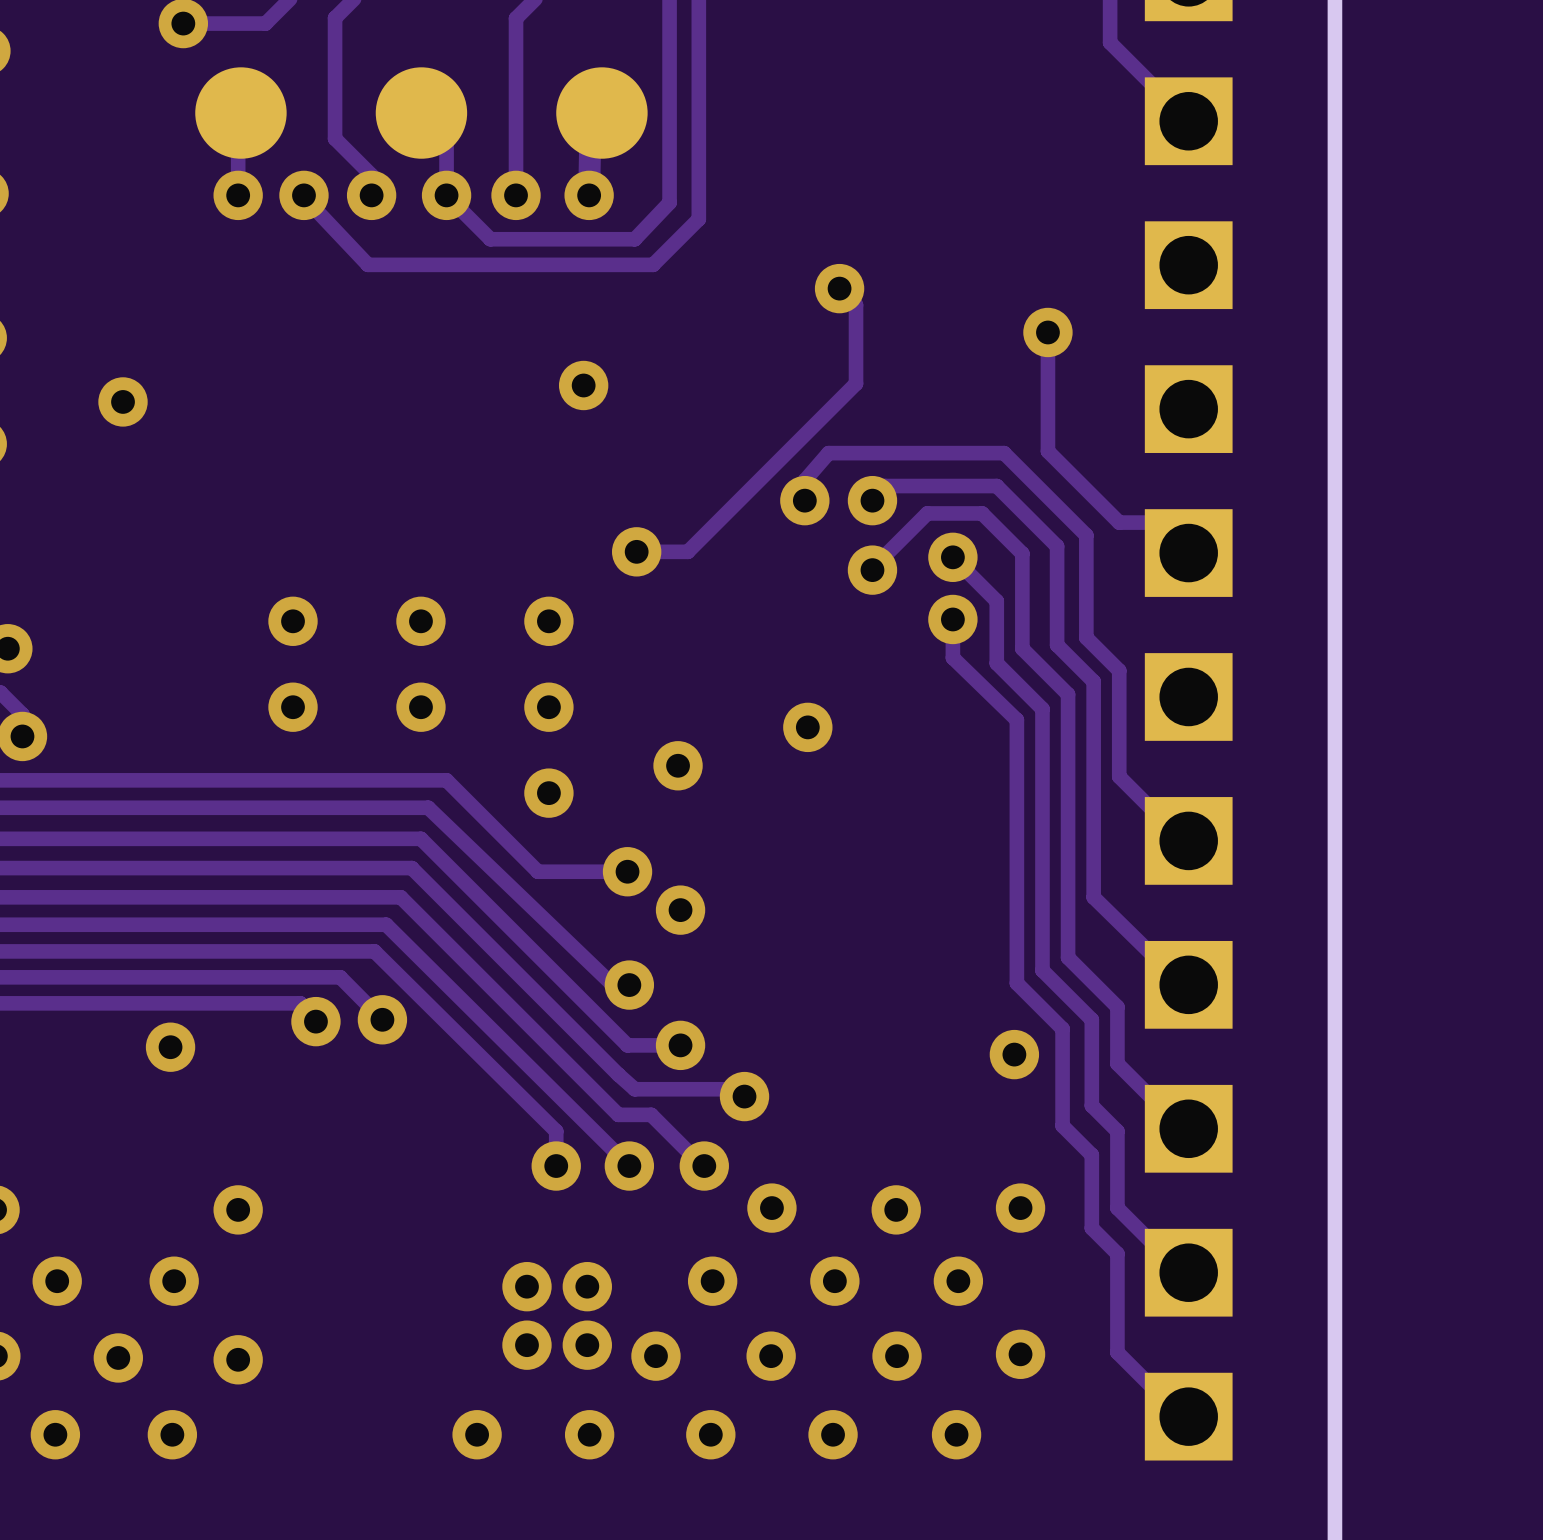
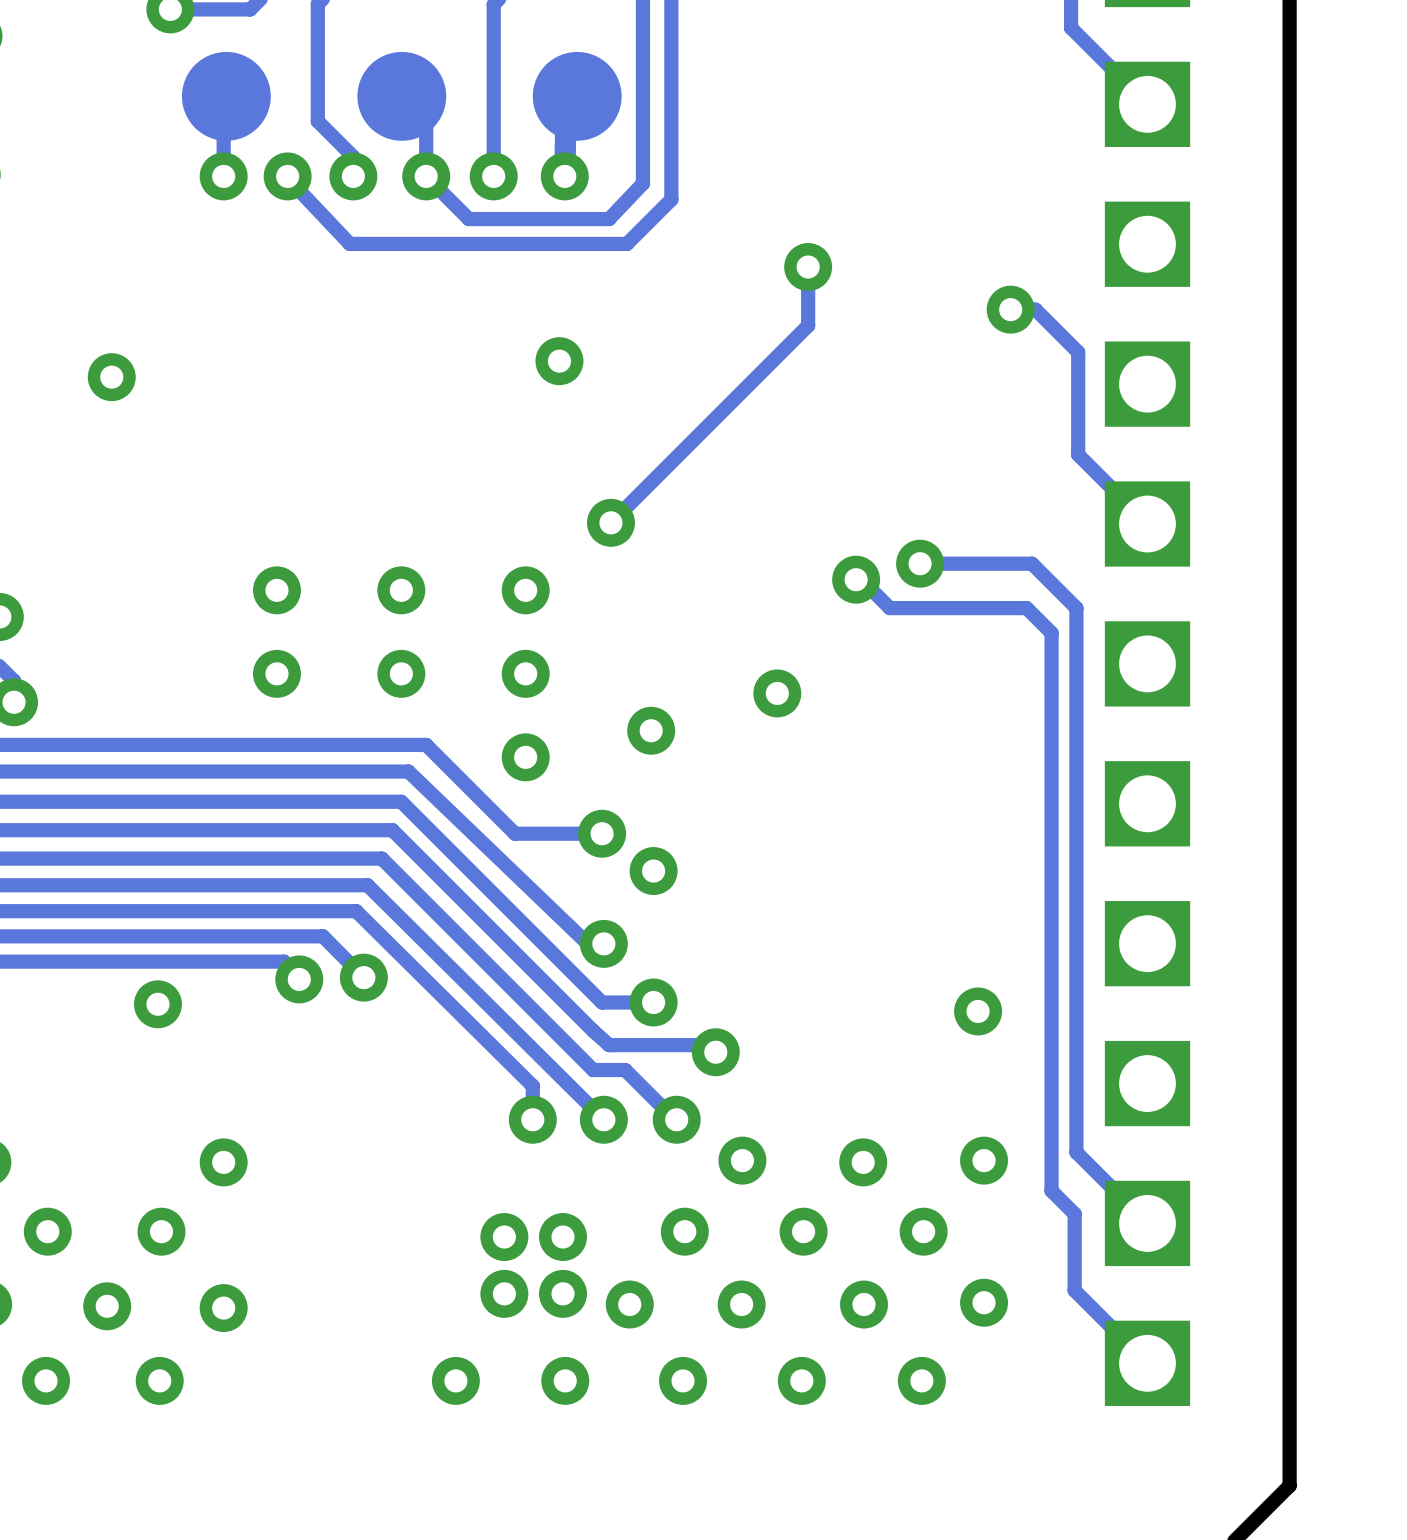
track: (839, 288) (856, 305) (856, 383) (687, 551) (636, 551) -> (808, 267) (808, 325) (610, 522)
track: (1047, 332) (1047, 451) (1119, 522) (1153, 522) (1188, 557) -> (1010, 309) (1035, 309) (1078, 352) (1078, 454) (1147, 524)
track: (804, 500) (804, 480) (828, 453) (1004, 453) (1086, 535) (1086, 637) (1119, 670) (1119, 776) (1188, 846) -> none
via: (804, 500) -> none
track: (872, 500) (885, 486) (996, 486) (1057, 546) (1057, 645) (1093, 681) (1093, 897) (1188, 990) -> none
via: (872, 500) -> none
track: (952, 557) (996, 601) (996, 663) (1042, 709) (1042, 970) (1091, 1019) (1091, 1105) (1117, 1131) (1117, 1208) (1188, 1279) -> none
via: (952, 557) -> none
track: (872, 570) (927, 513) (982, 513) (1022, 553) (1022, 648) (1068, 694) (1068, 957) (1117, 1007) (1117, 1063) (1188, 1134) -> none
via position: (872, 570) -> (856, 579)
track: none -> (920, 563) (1032, 563) (1076, 608) (1076, 1152) (1147, 1223)
via: none -> (920, 563)
track: none -> (856, 579) (861, 579) (889, 608) (1026, 608) (1051, 632) (1051, 1190) (1074, 1213) (1074, 1290) (1147, 1363)
track: (952, 619) (952, 657) (1016, 720) (1016, 983) (1062, 1028) (1062, 1125) (1091, 1155) (1091, 1228) (1117, 1253) (1117, 1352) (1188, 1423) -> none
via: (952, 619) -> none

